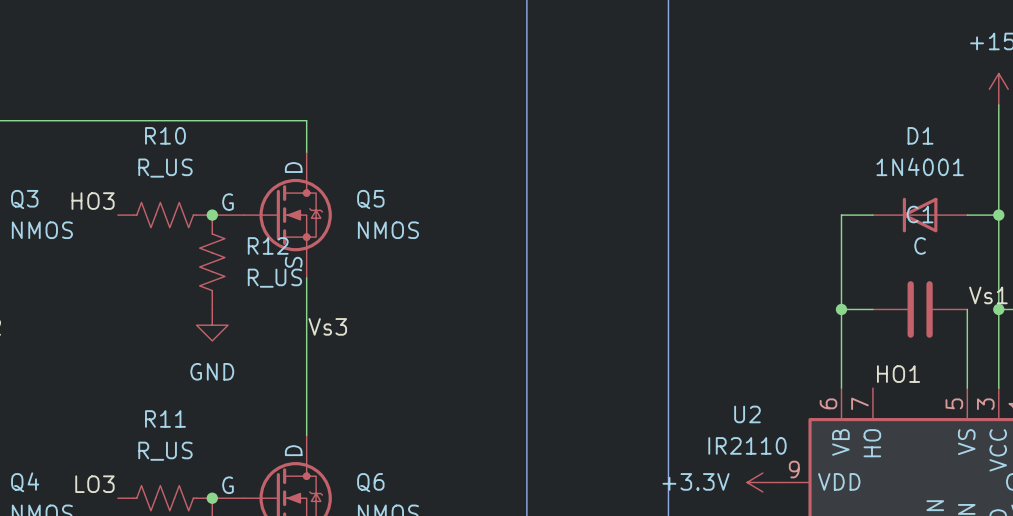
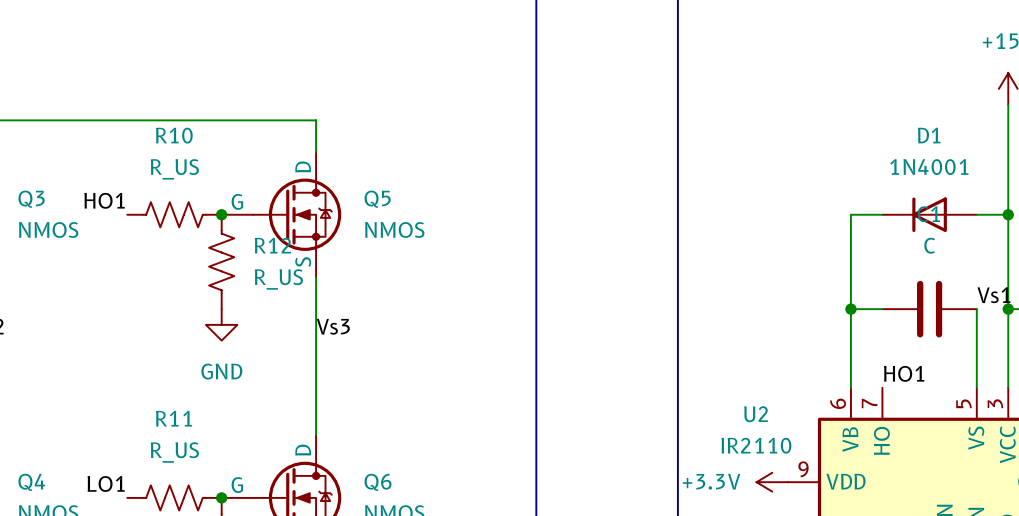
label: HO3 (93, 201) -> HO1 (104, 200)
label: LO3 (94, 484) -> LO1 (106, 483)

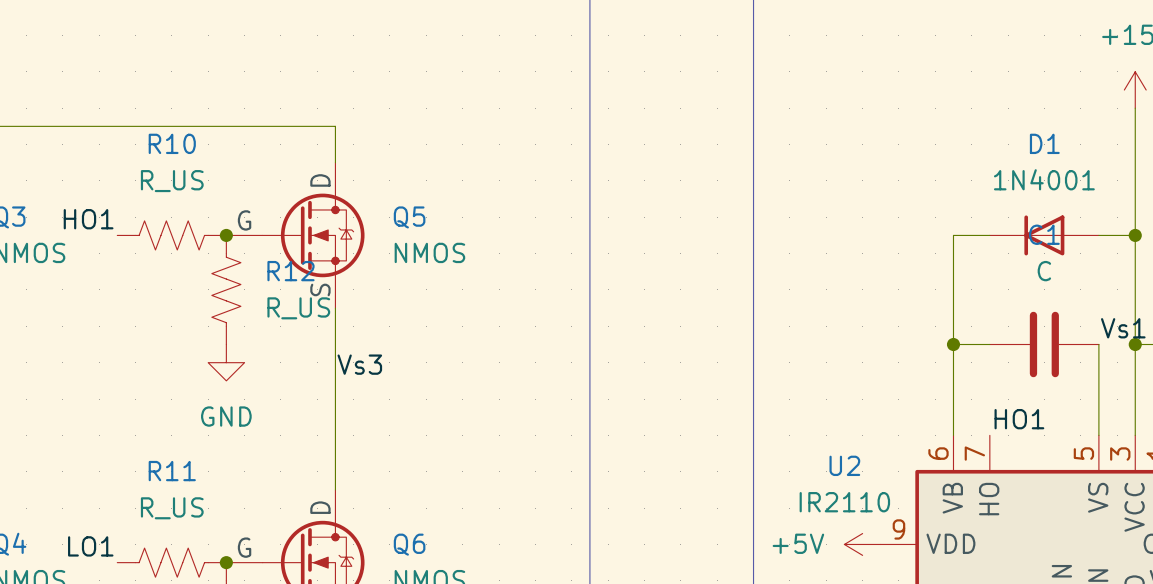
power symbol: +3.3V (772, 482) -> +5V (862, 544)

